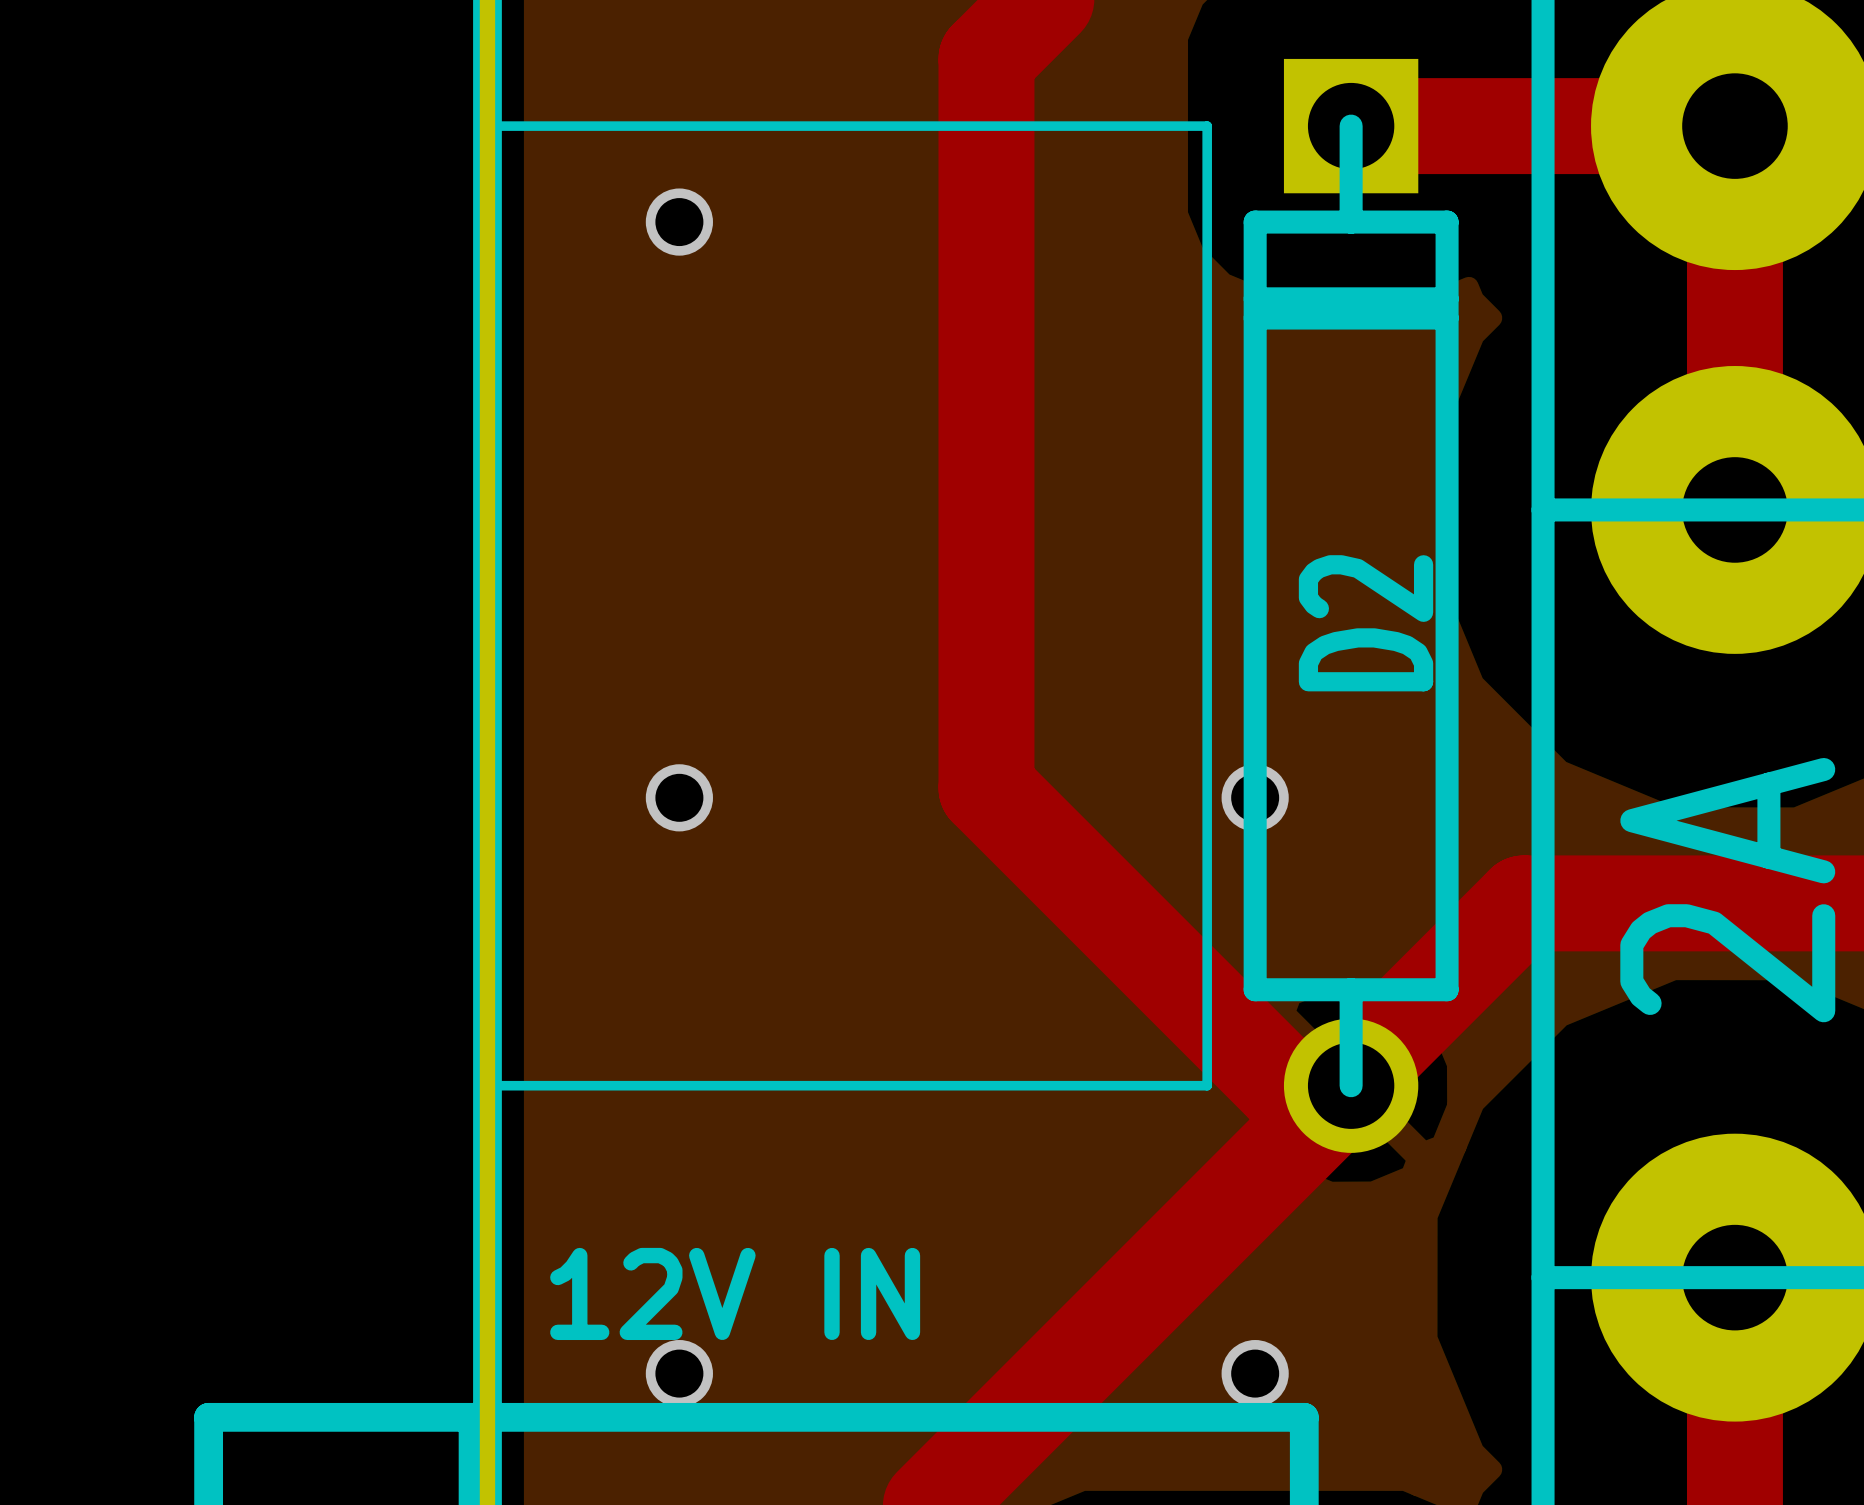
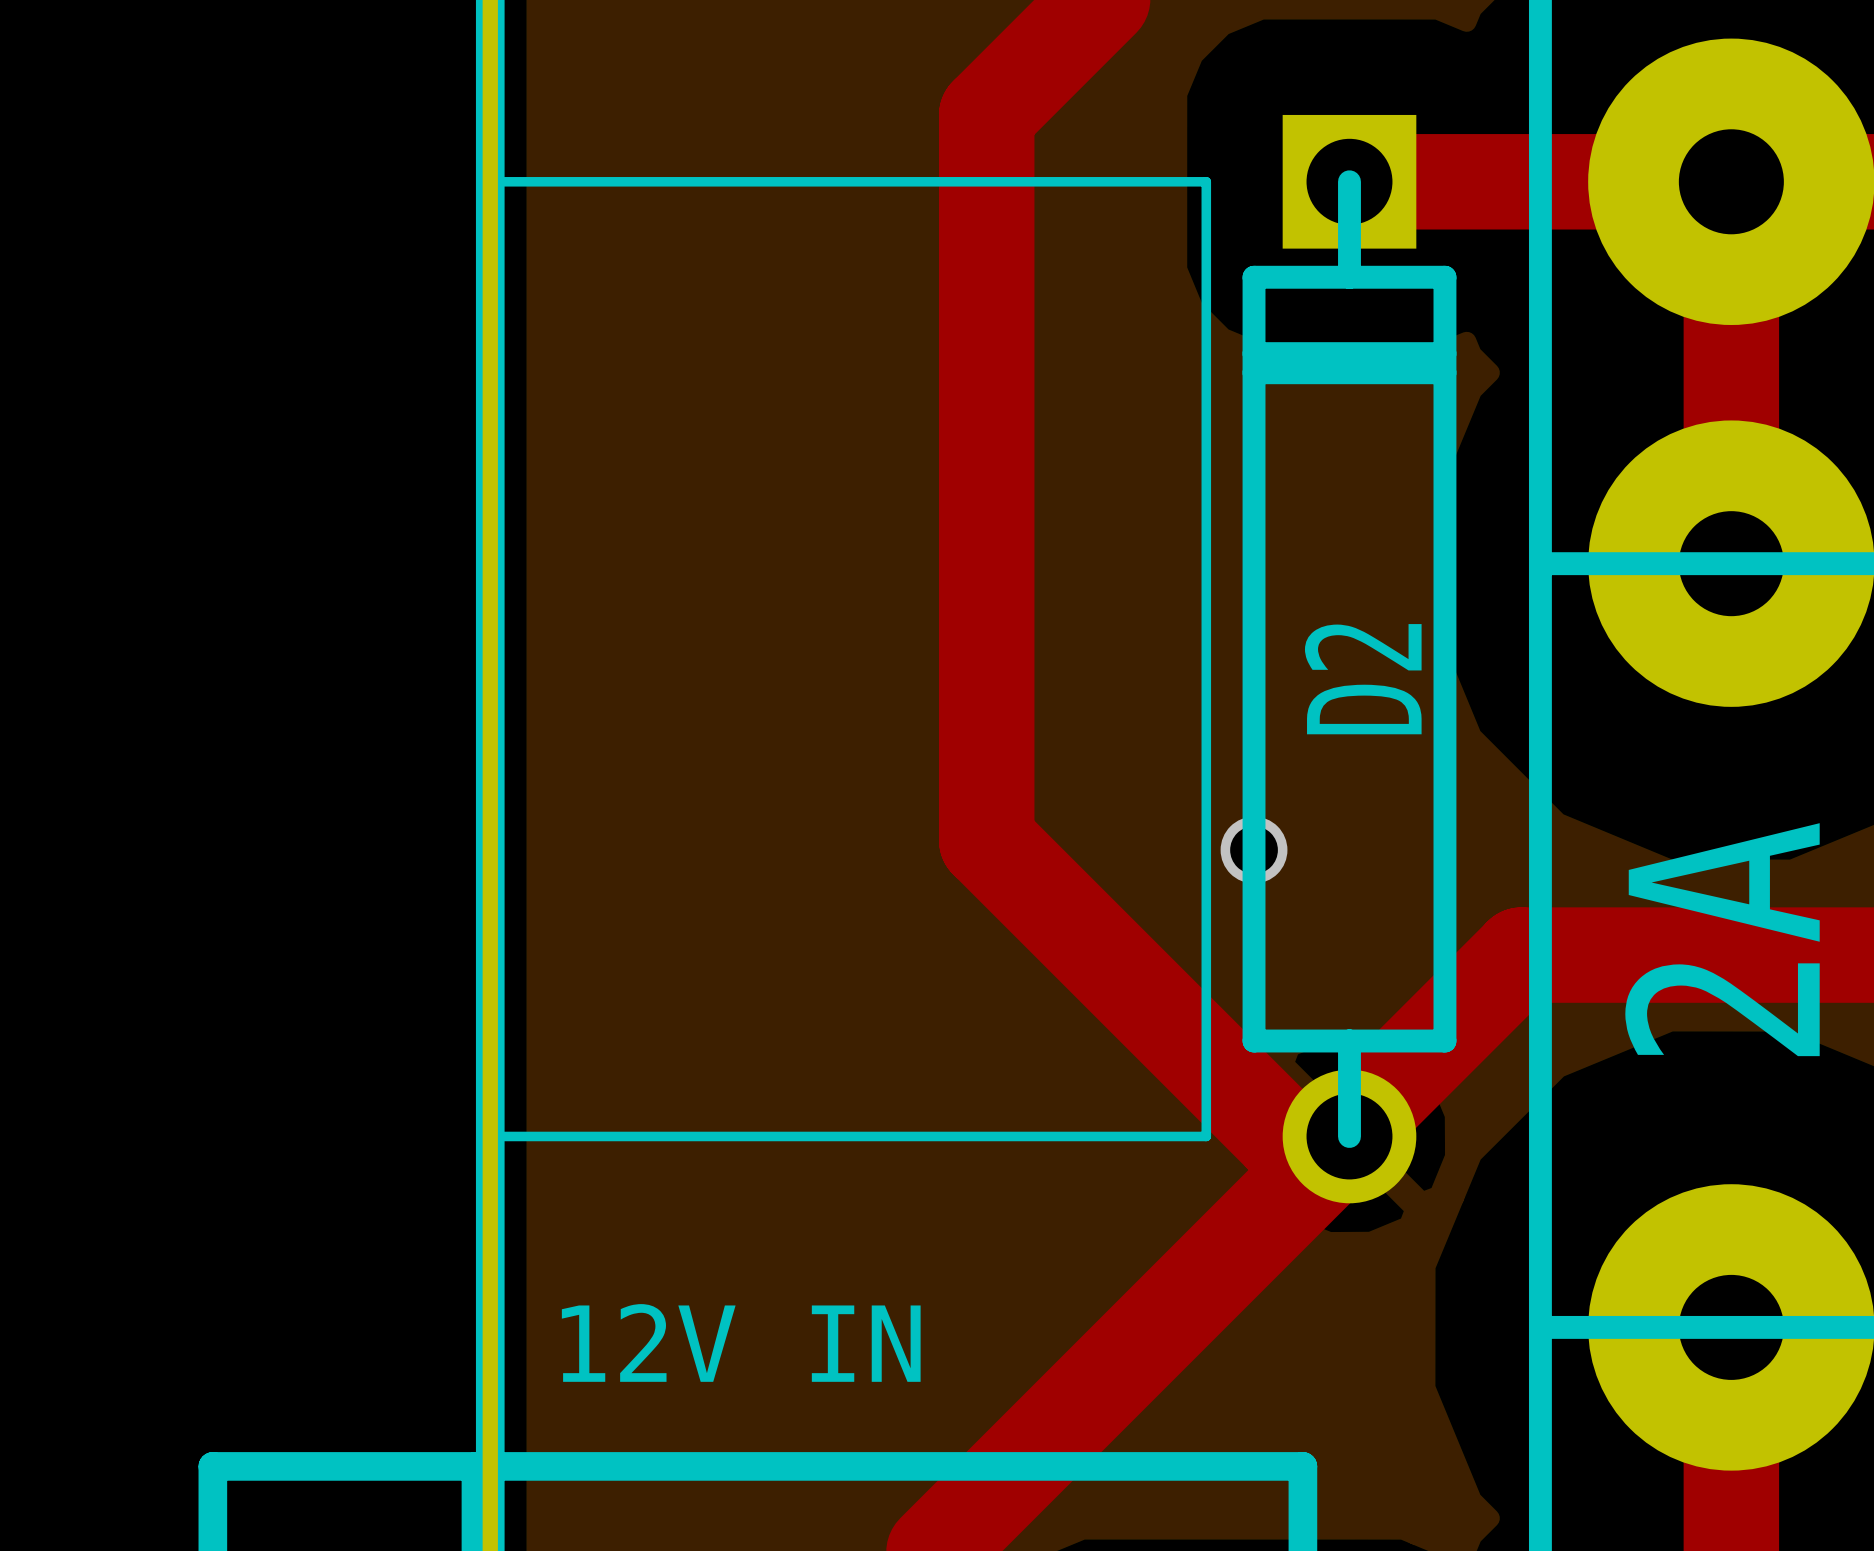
via: (679, 222) -> none
via: (679, 797) -> none
via: (679, 1373) -> none
via: (1255, 1373) -> none

